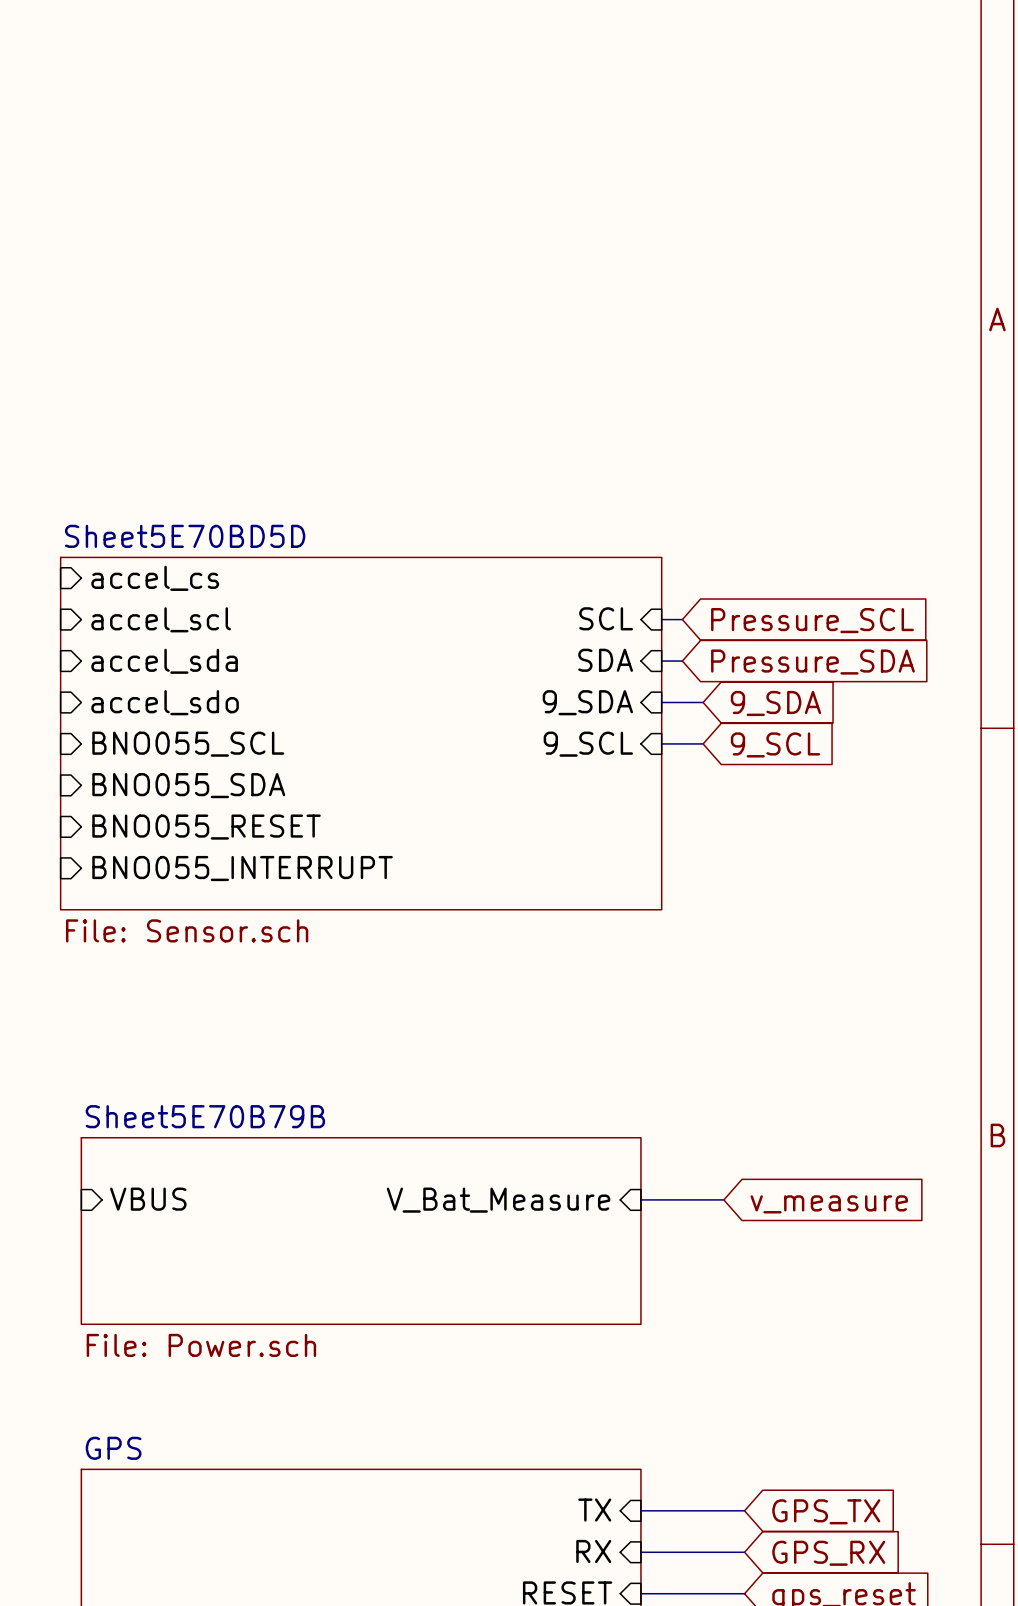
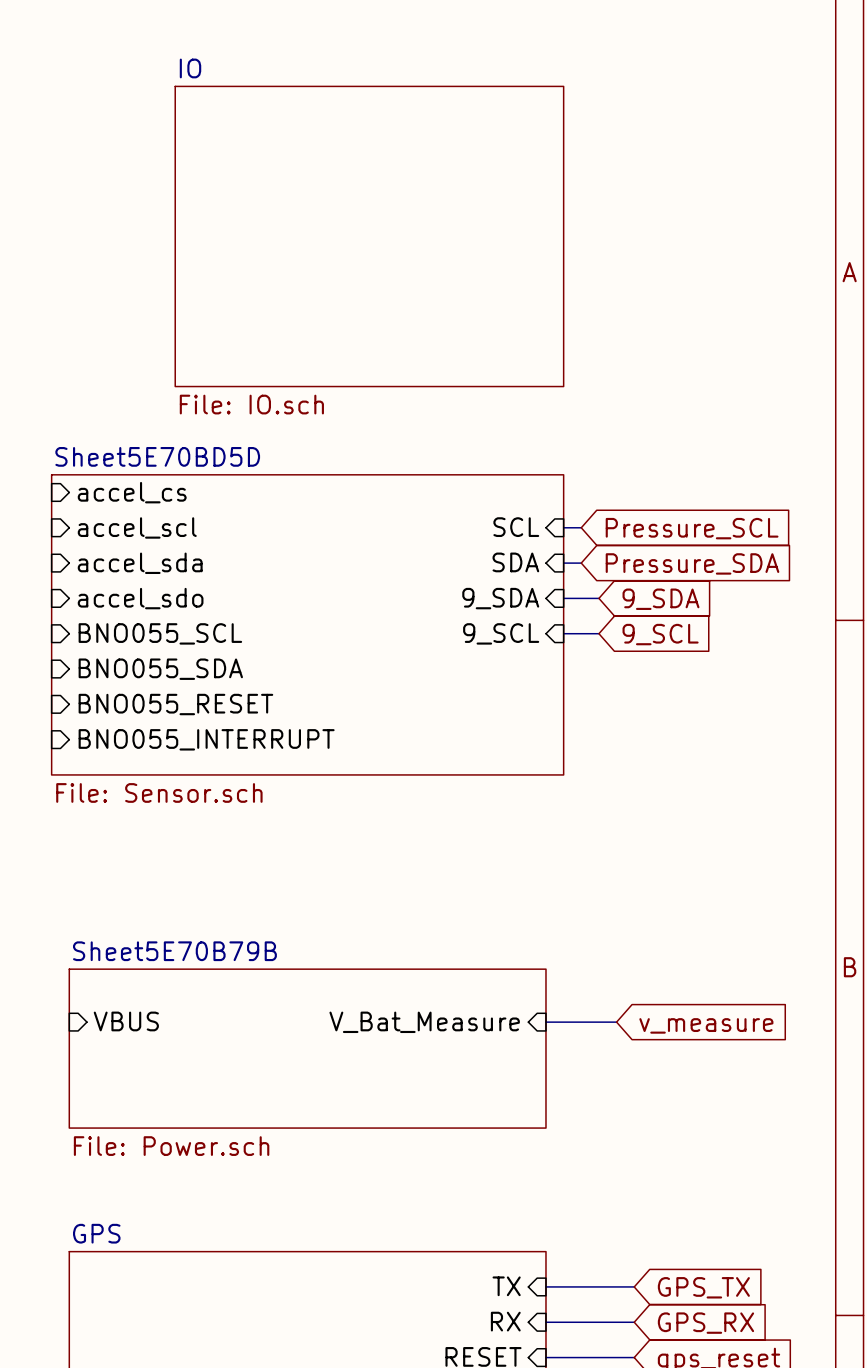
sheet IO: none -> File: IO.sch (369, 236)

